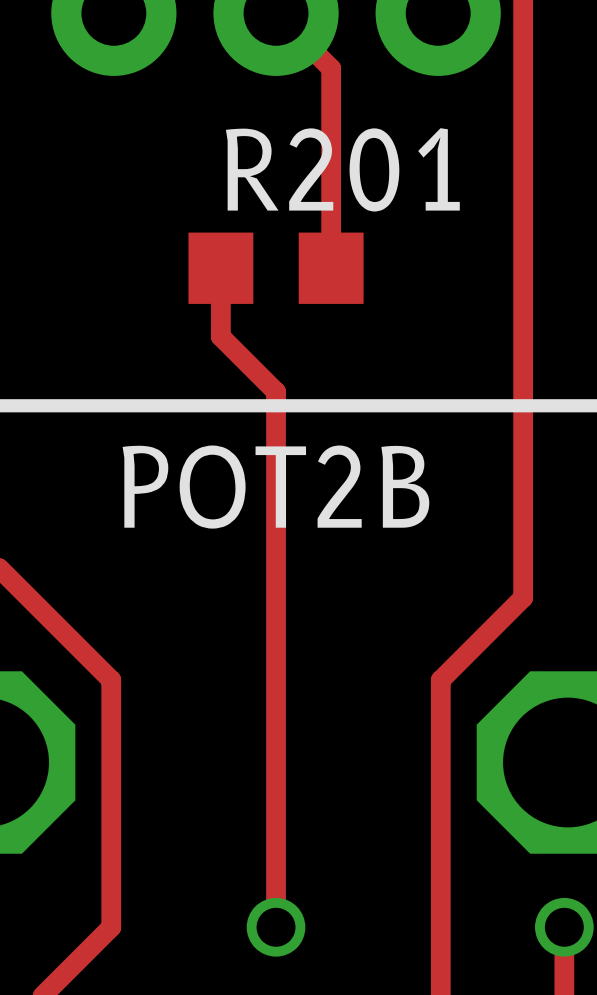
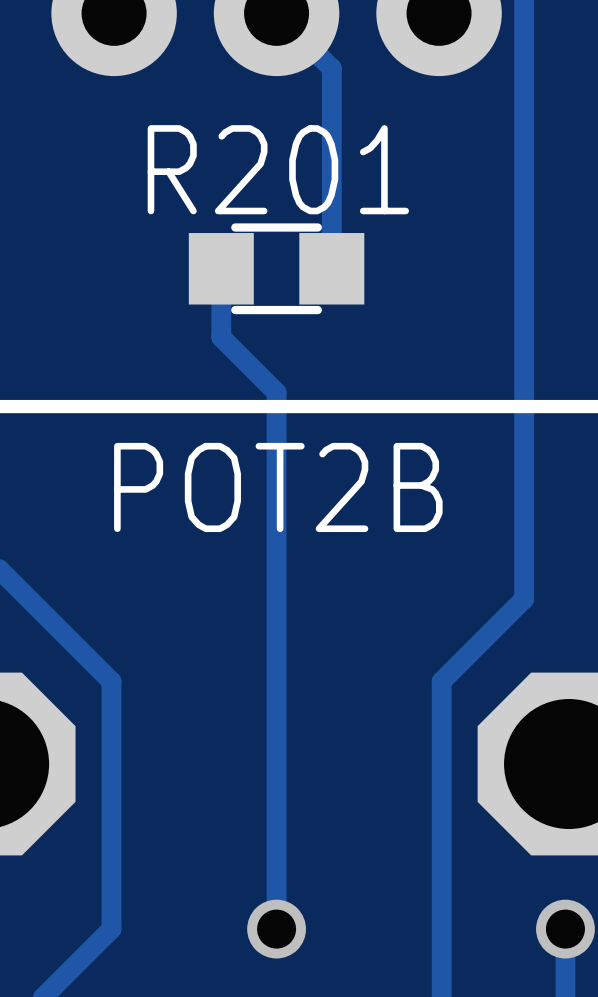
R201 footprint: [188, 232, 364, 304] -> [188, 223, 365, 315]

